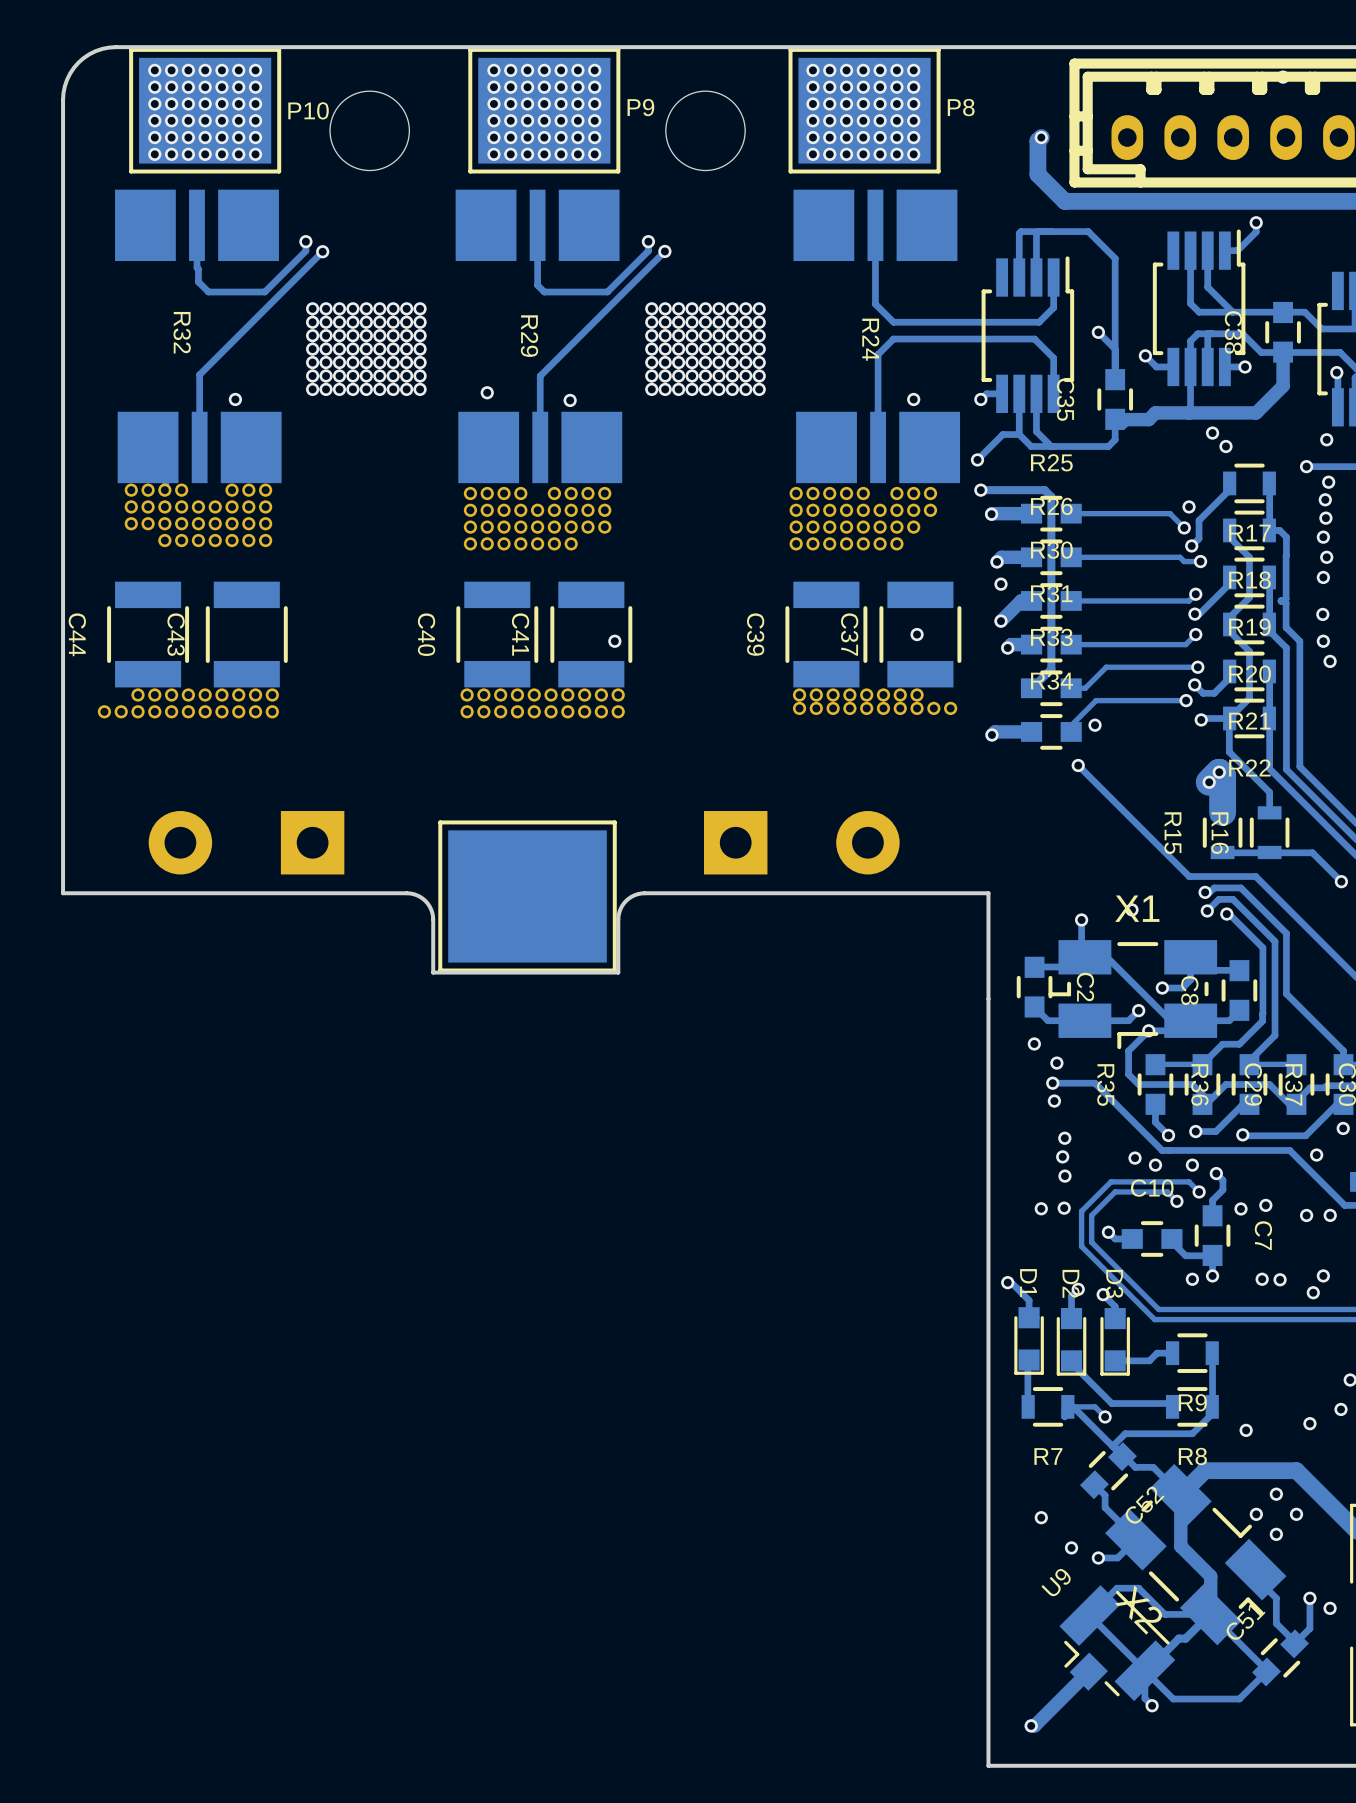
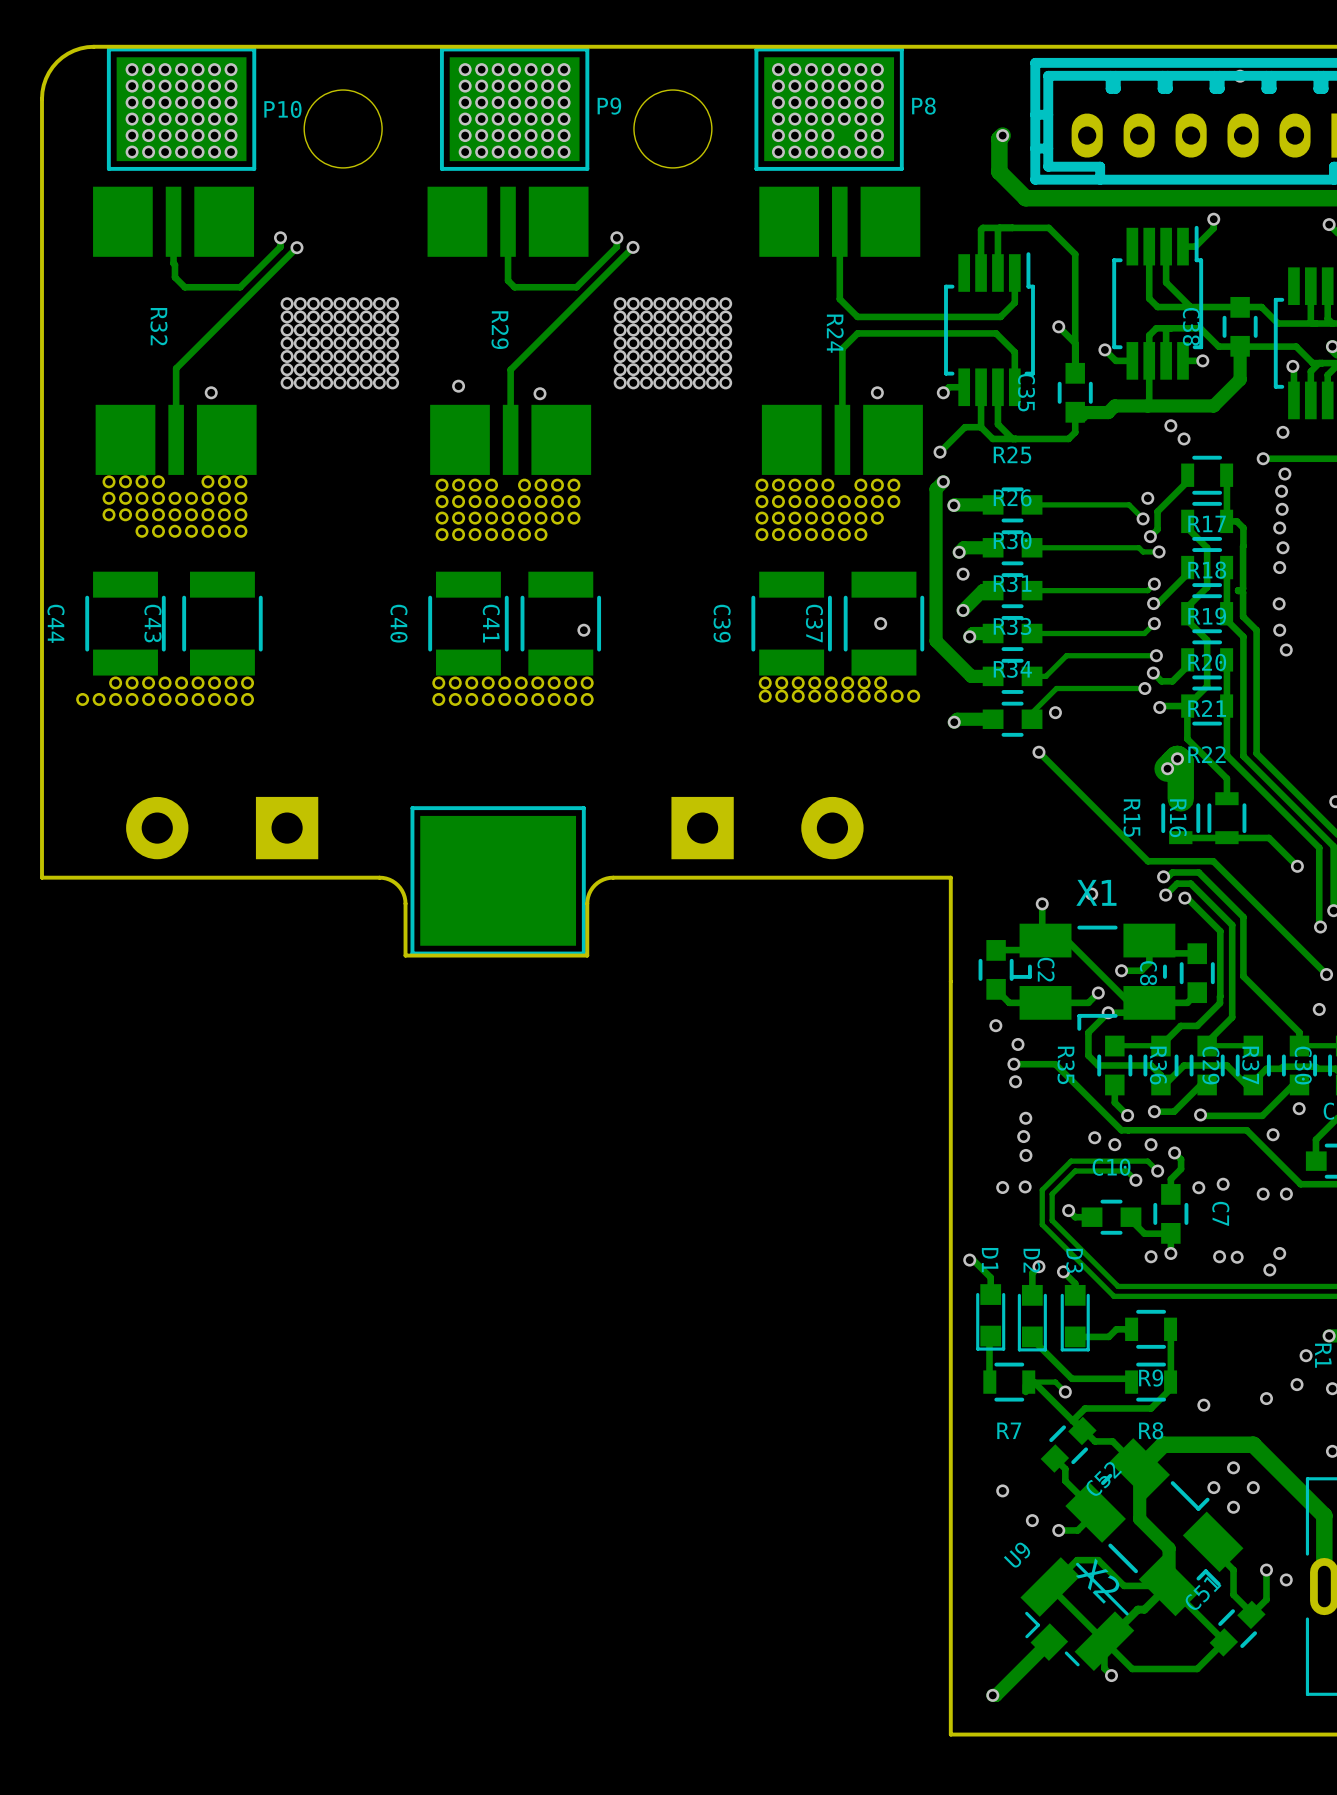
via: (880, 137) -> none
track: (980, 490) (1044, 490) (1051, 496) (1051, 669) (1031, 688) -> (943, 481) (936, 489) (936, 641) (971, 676) (992, 676)

